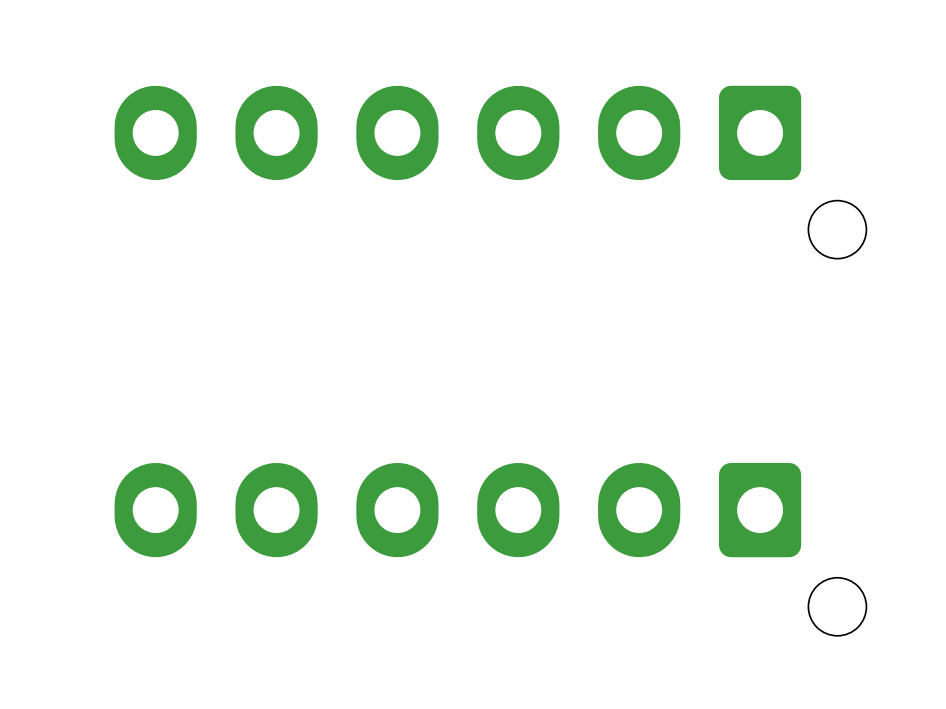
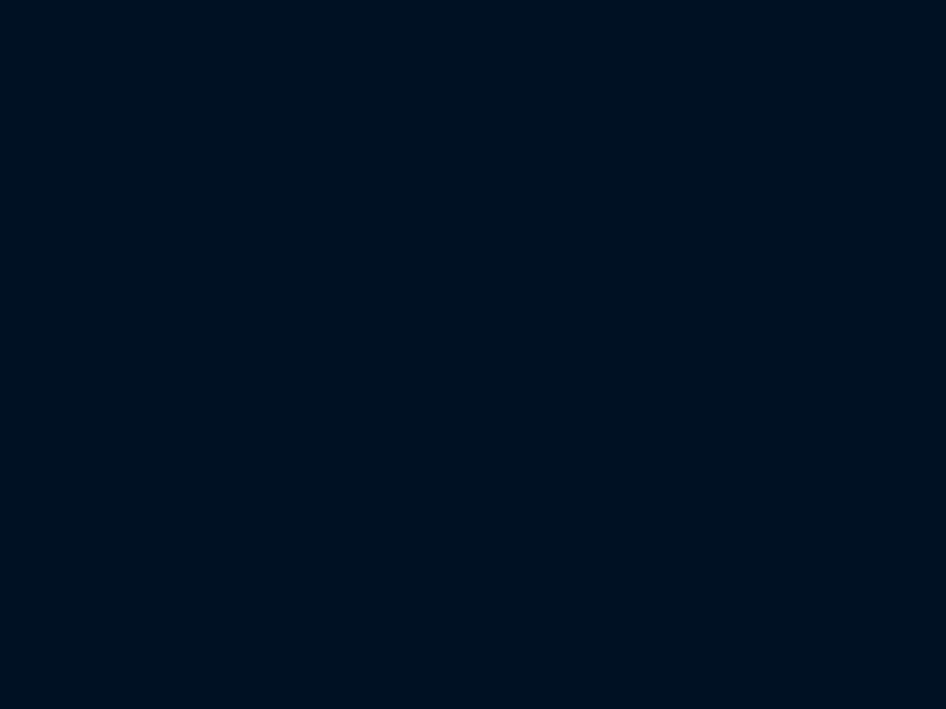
part: (490, 172) -> none
part: (490, 549) -> none

